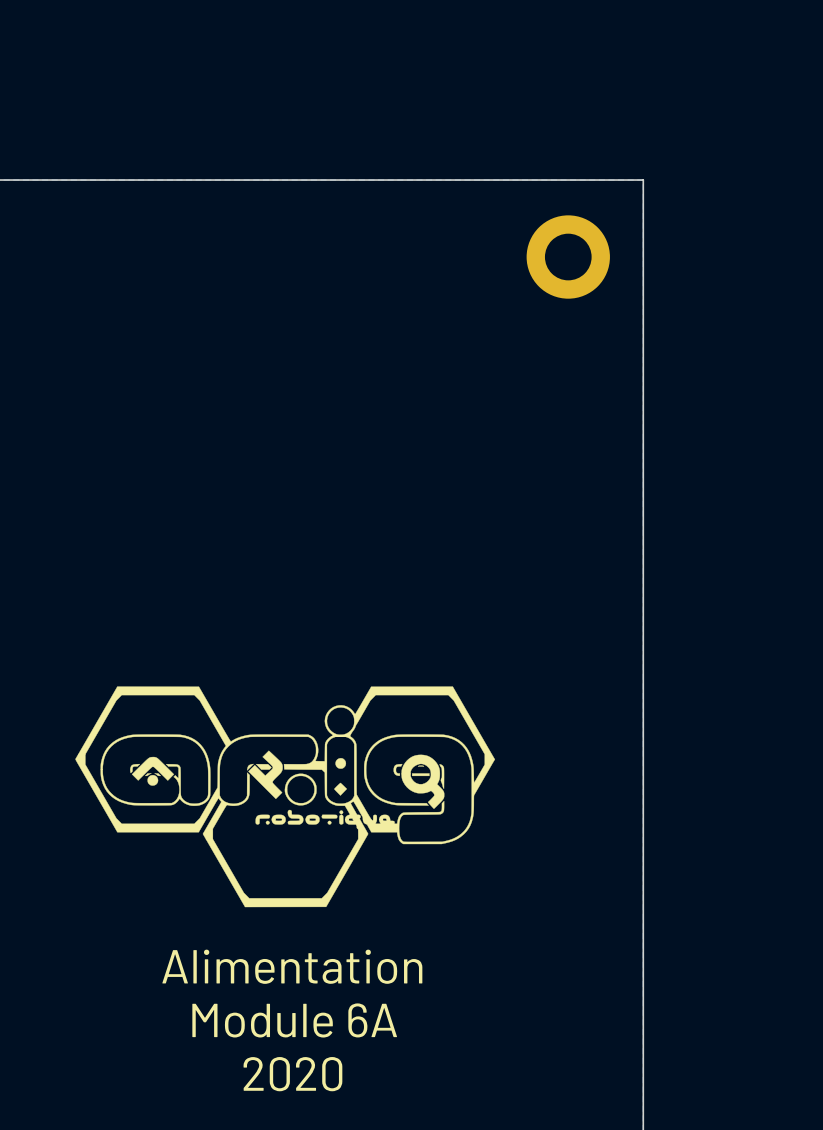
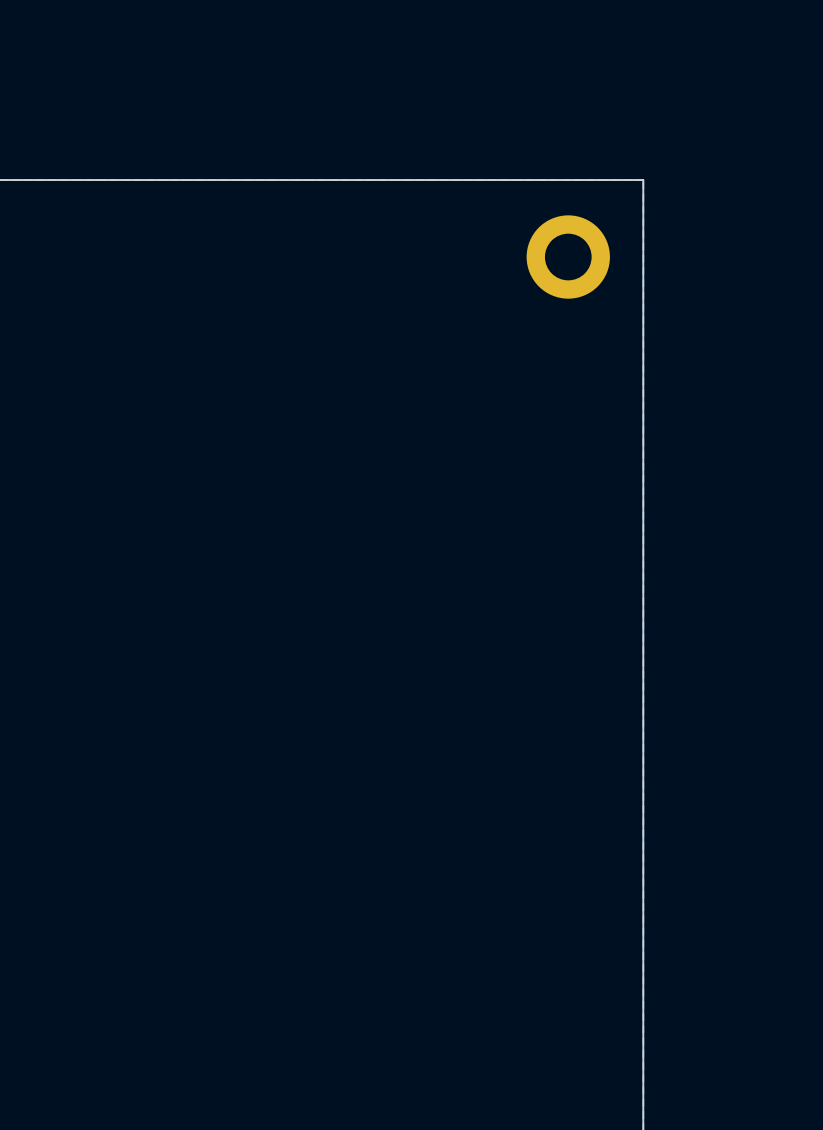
drawing: [75, 686, 496, 908] -> none
text: Alimentation (292, 966) -> none
text: Module 6A (294, 1020) -> none
text: 2020 (292, 1074) -> none

